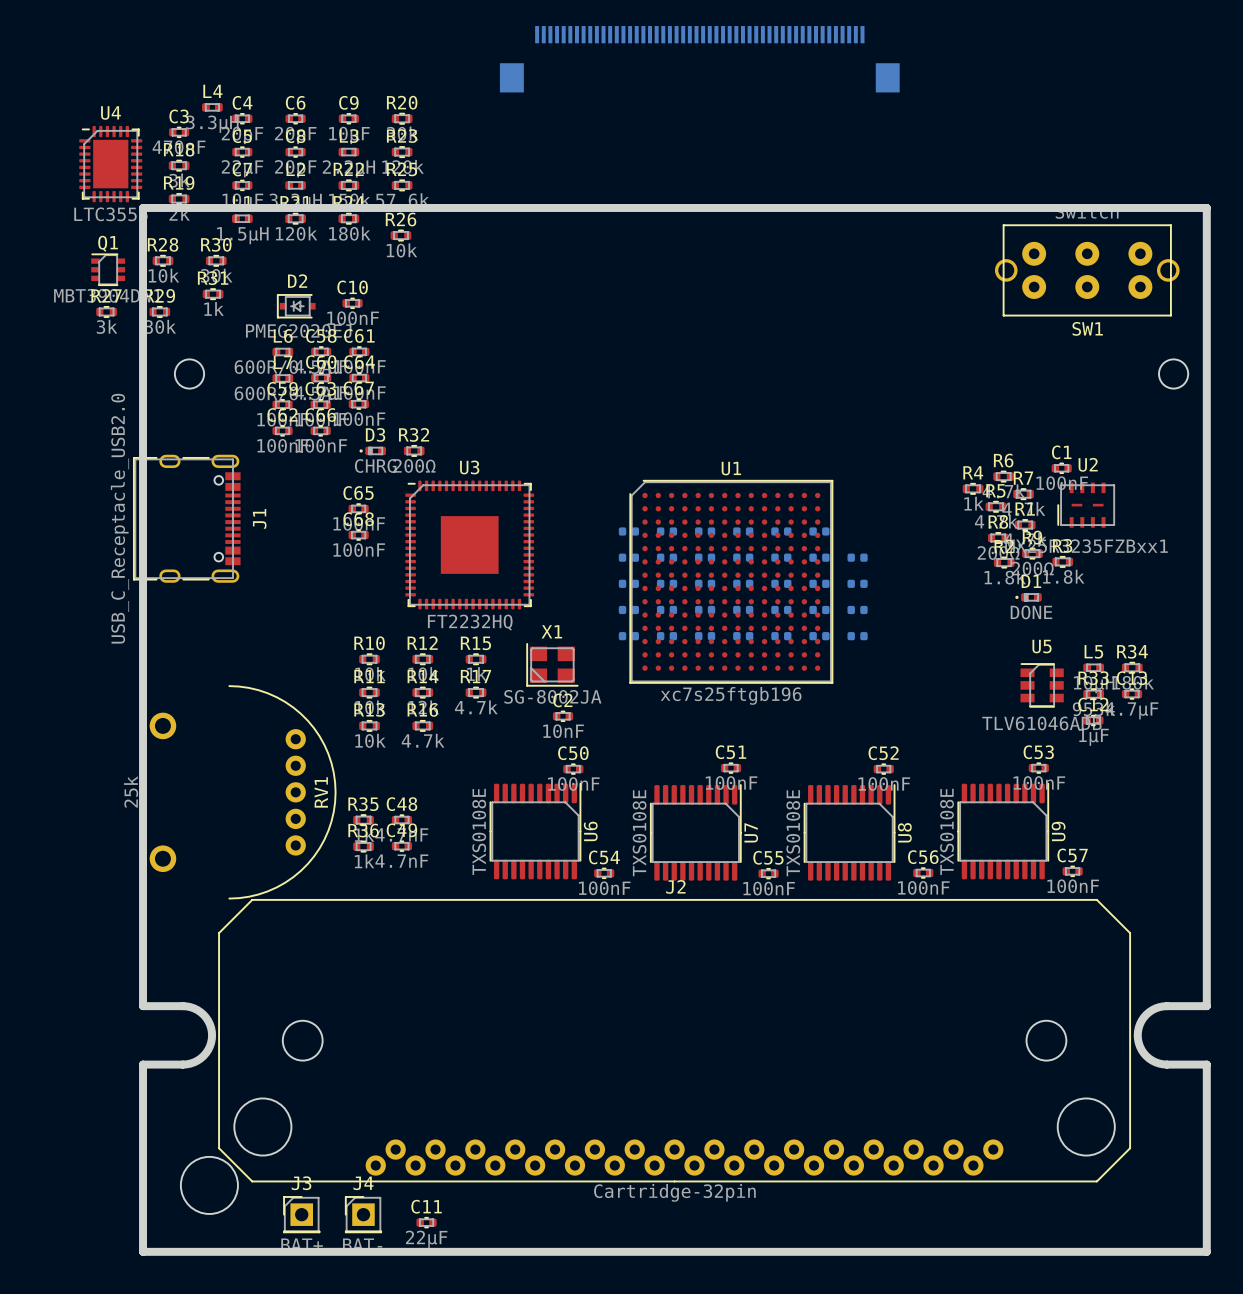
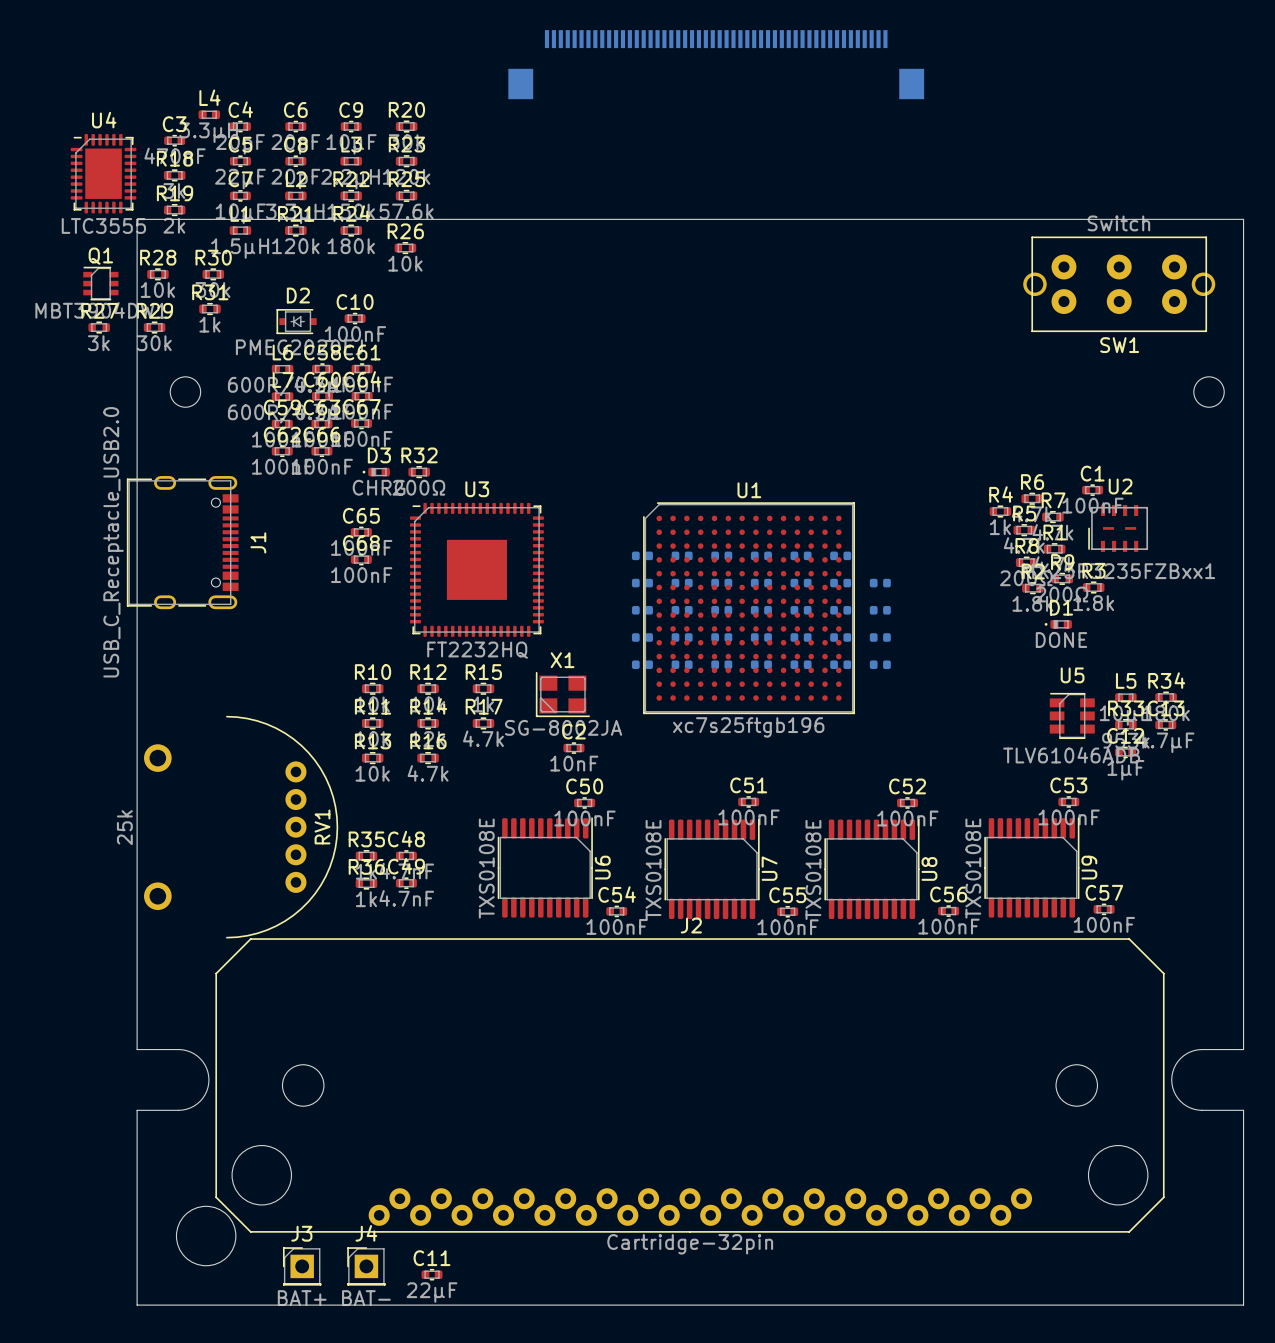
board edge width: thick (143, 207) (143, 1006) (182, 1006) (194, 1008) (206, 1017) (212, 1035) (206, 1053) (194, 1062) (182, 1064) (143, 1064) (143, 1251) (1206, 1251) (1206, 1064) (1166, 1064) (1155, 1062) (1141, 1049) (1137, 1035) (1141, 1020) (1155, 1008) (1166, 1006) (1206, 1006) (1206, 207) (143, 207) -> thin (137, 219) (137, 1049) (178, 1049) (190, 1051) (202, 1061) (206, 1068) (208, 1079) (206, 1091) (202, 1098) (190, 1108) (178, 1110) (137, 1110) (137, 1305) (1243, 1305) (1243, 1110) (1202, 1110) (1190, 1108) (1180, 1101) (1175, 1095) (1171, 1079) (1175, 1064) (1180, 1058) (1190, 1051) (1202, 1049) (1243, 1049) (1243, 219) (137, 219)

